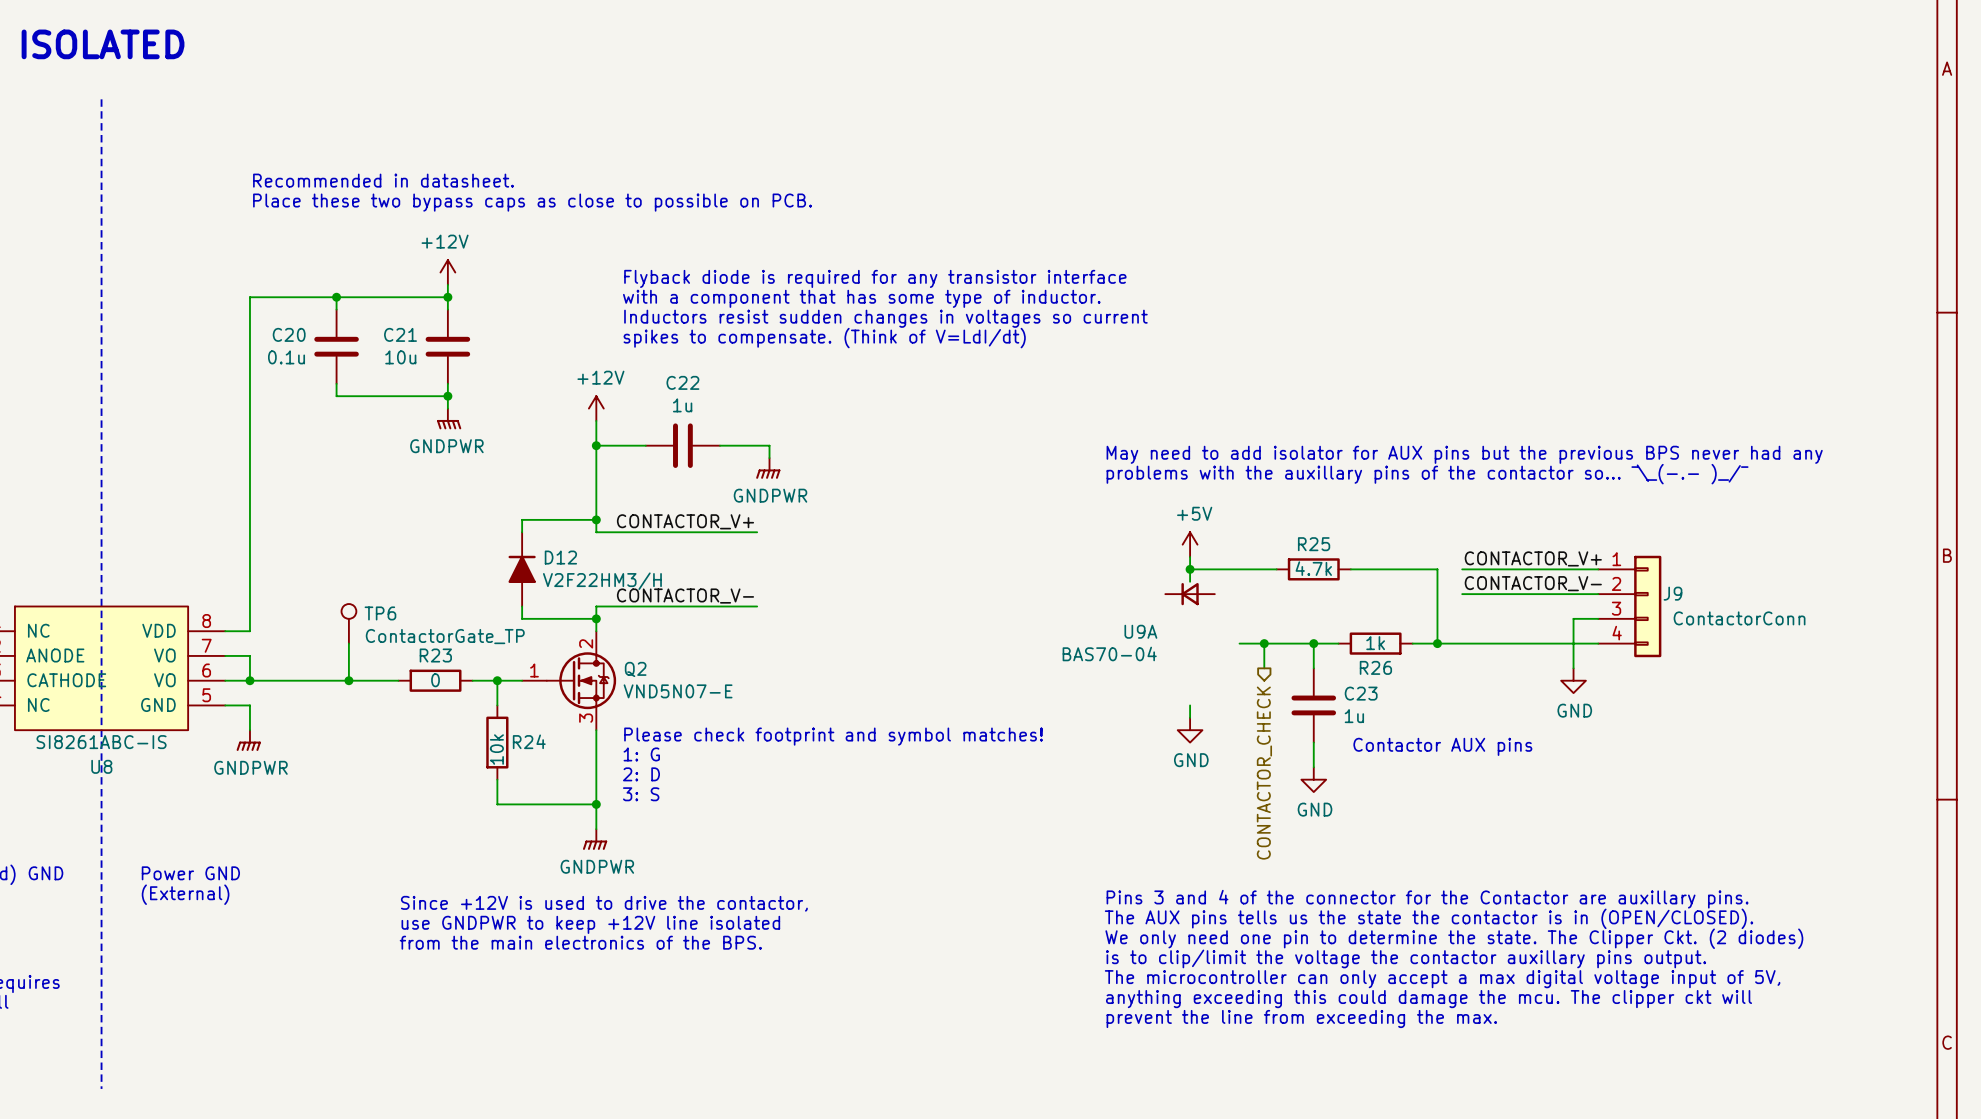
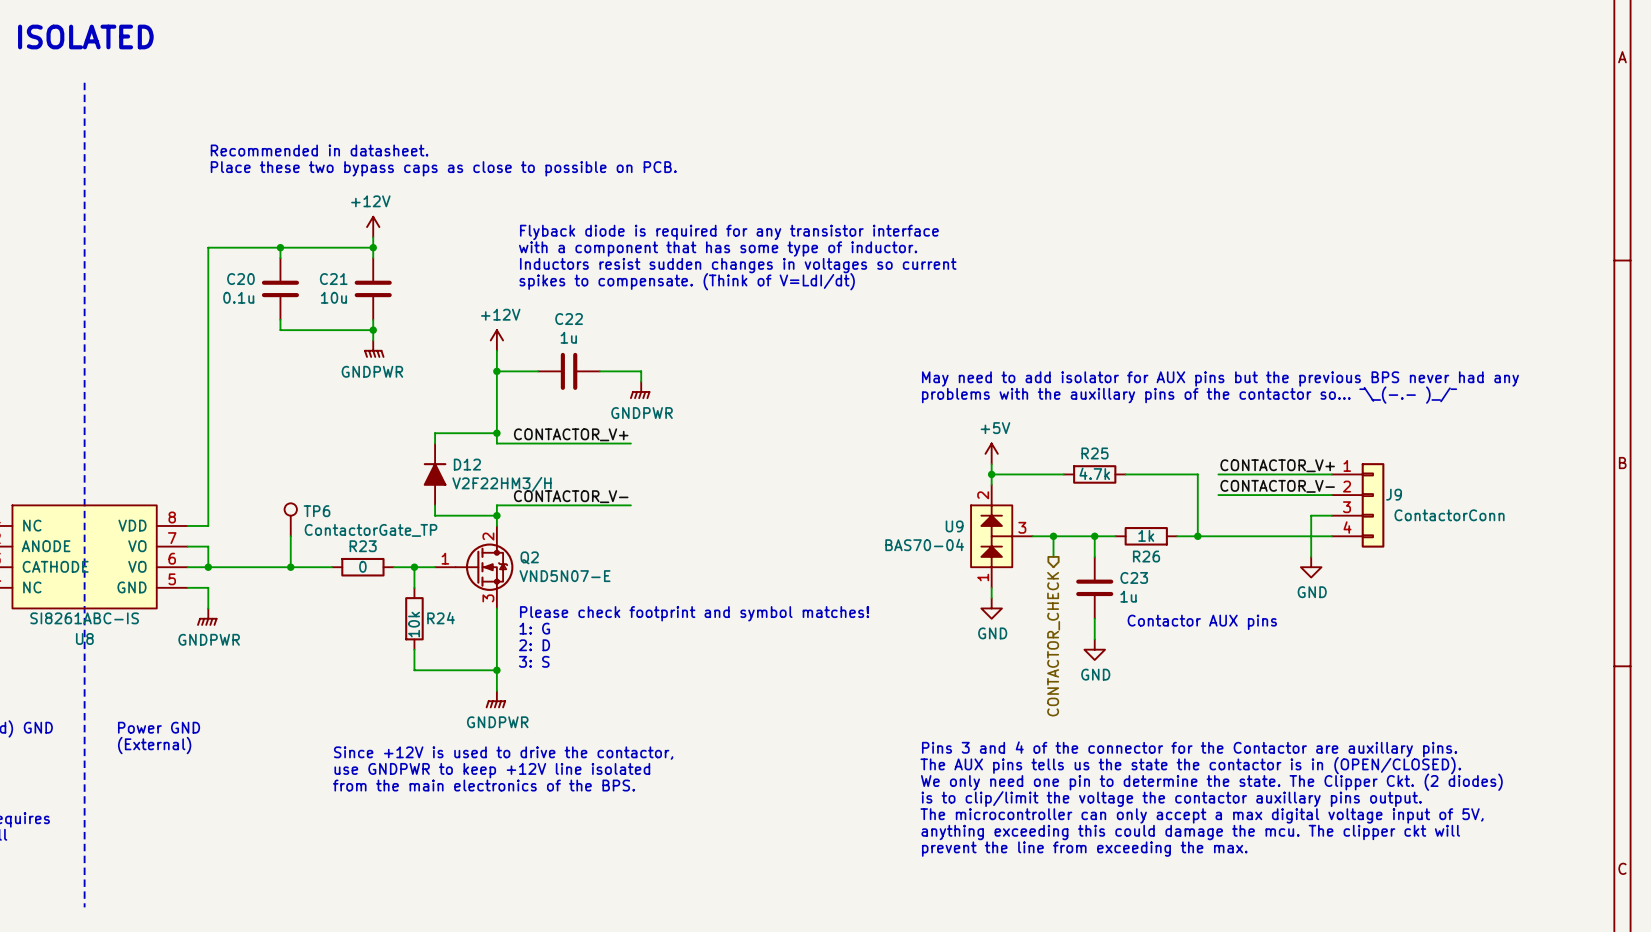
U9A: BAS70-04 (1190, 594) -> none
U9: none -> BAS70-04 (1001, 536)

